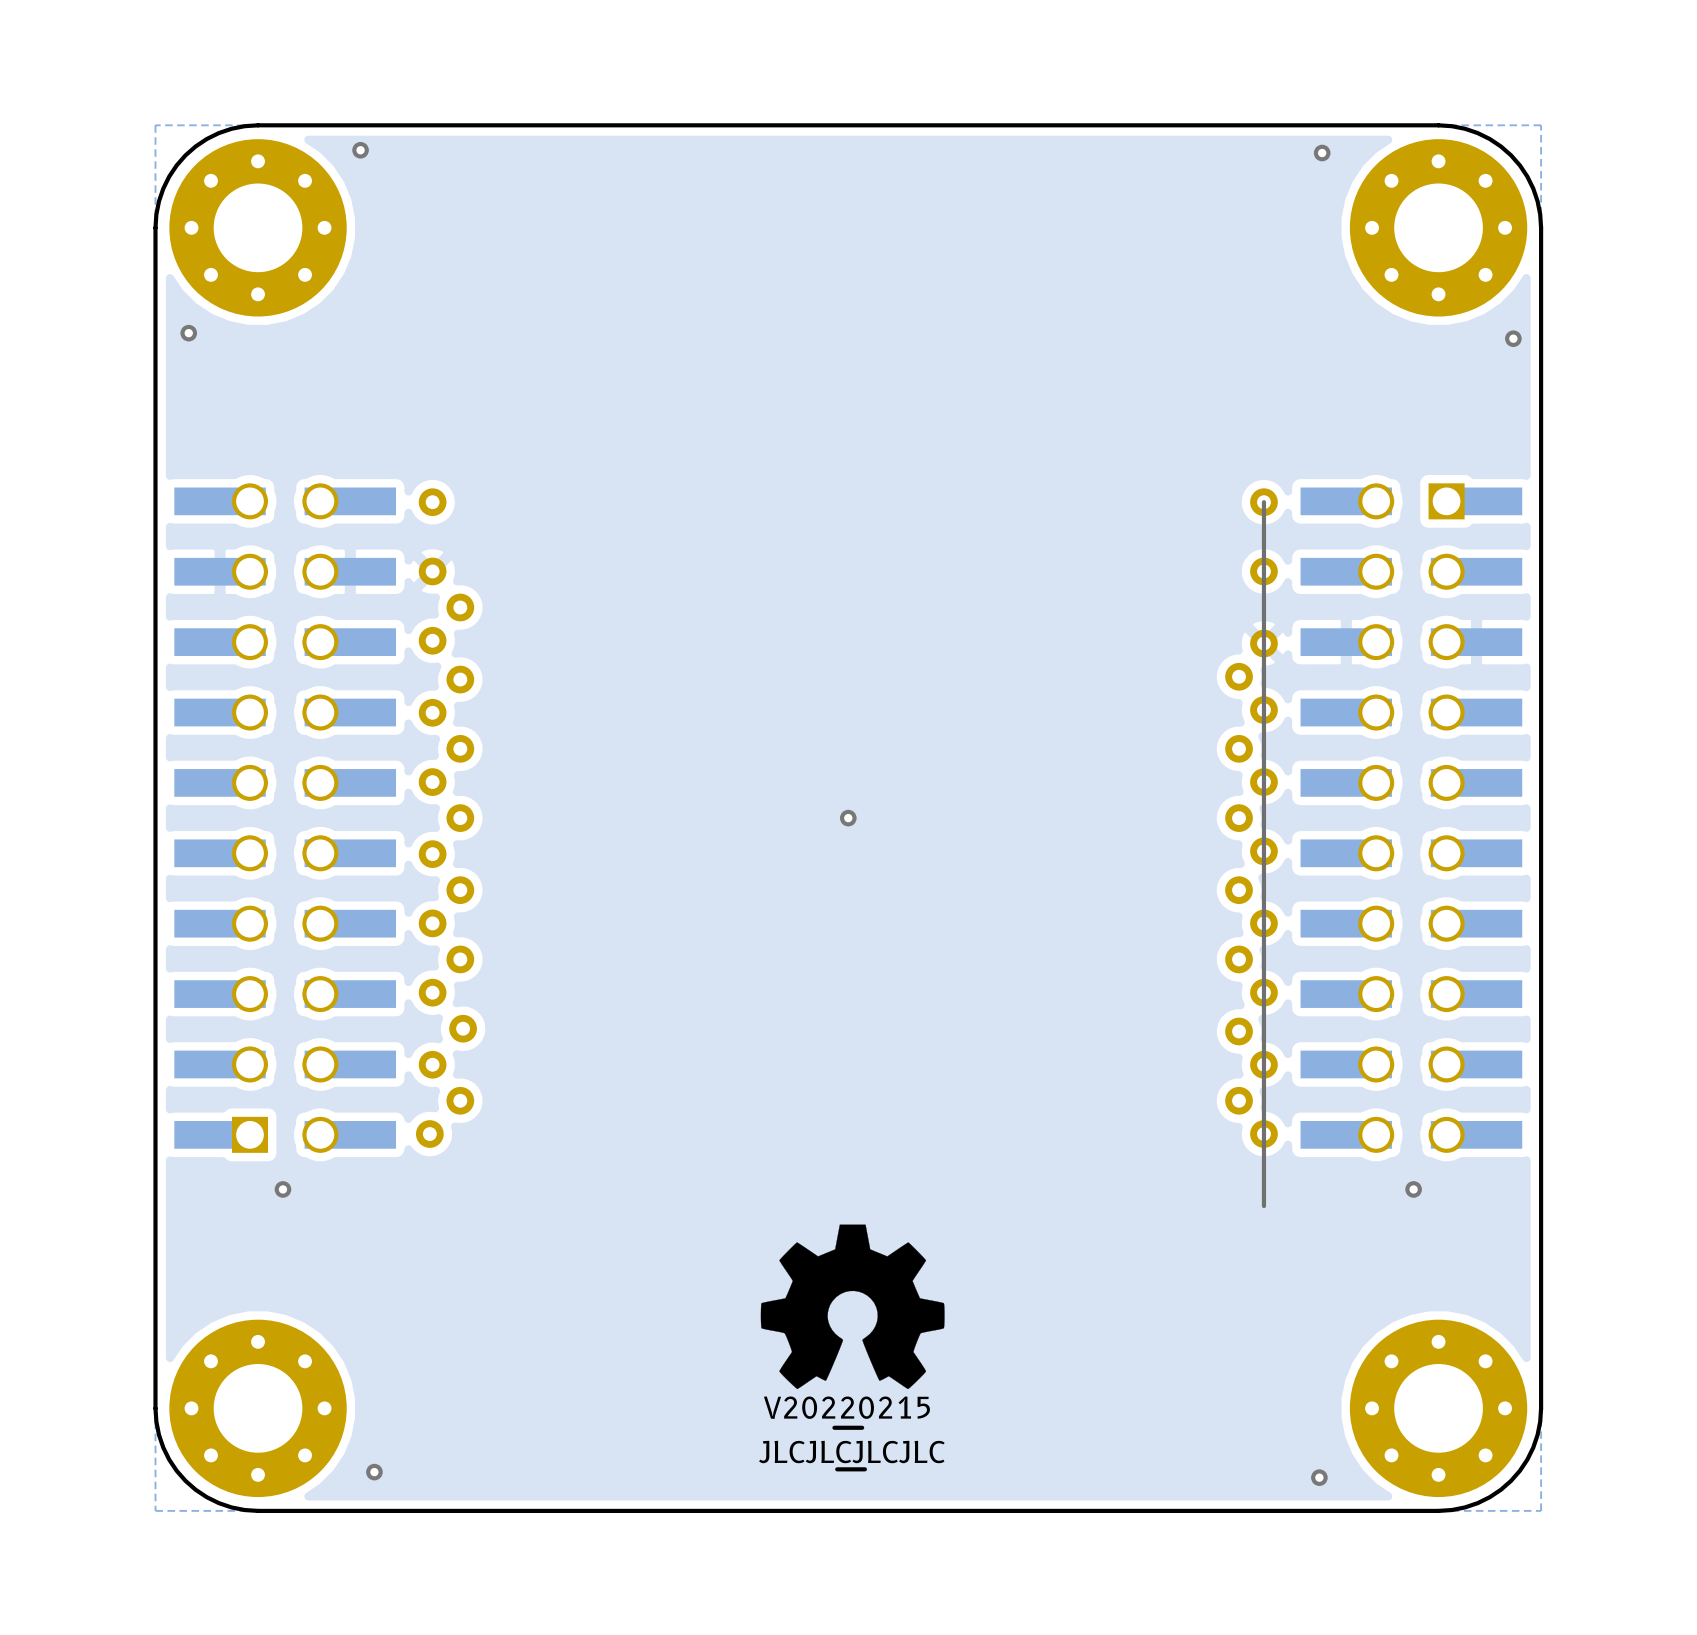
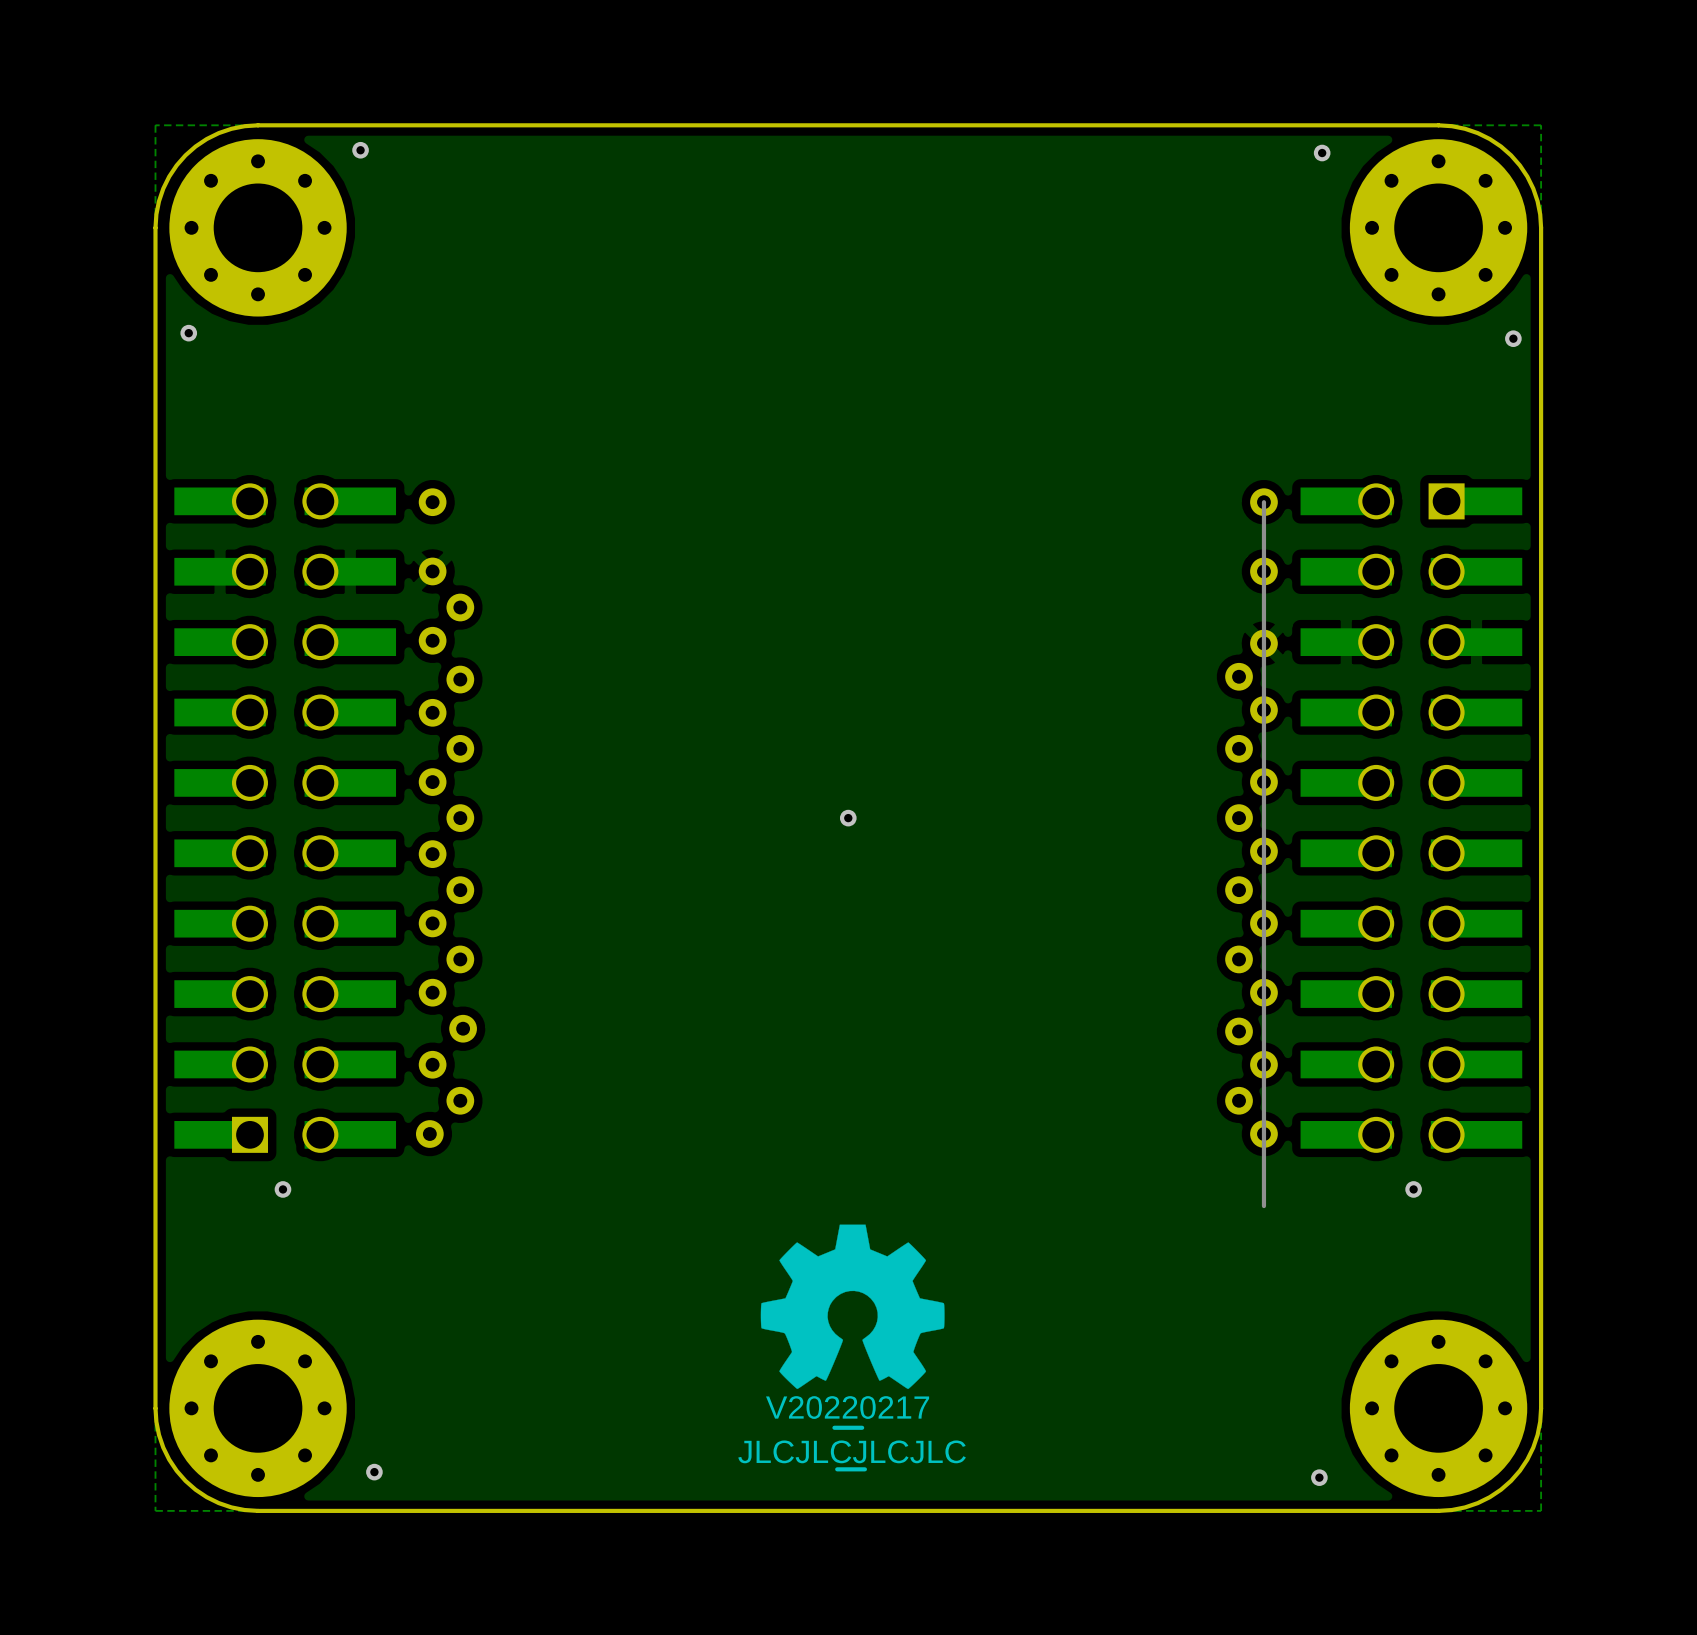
drawing shape: [763, 1396, 930, 1430] -> [766, 1396, 930, 1430]

